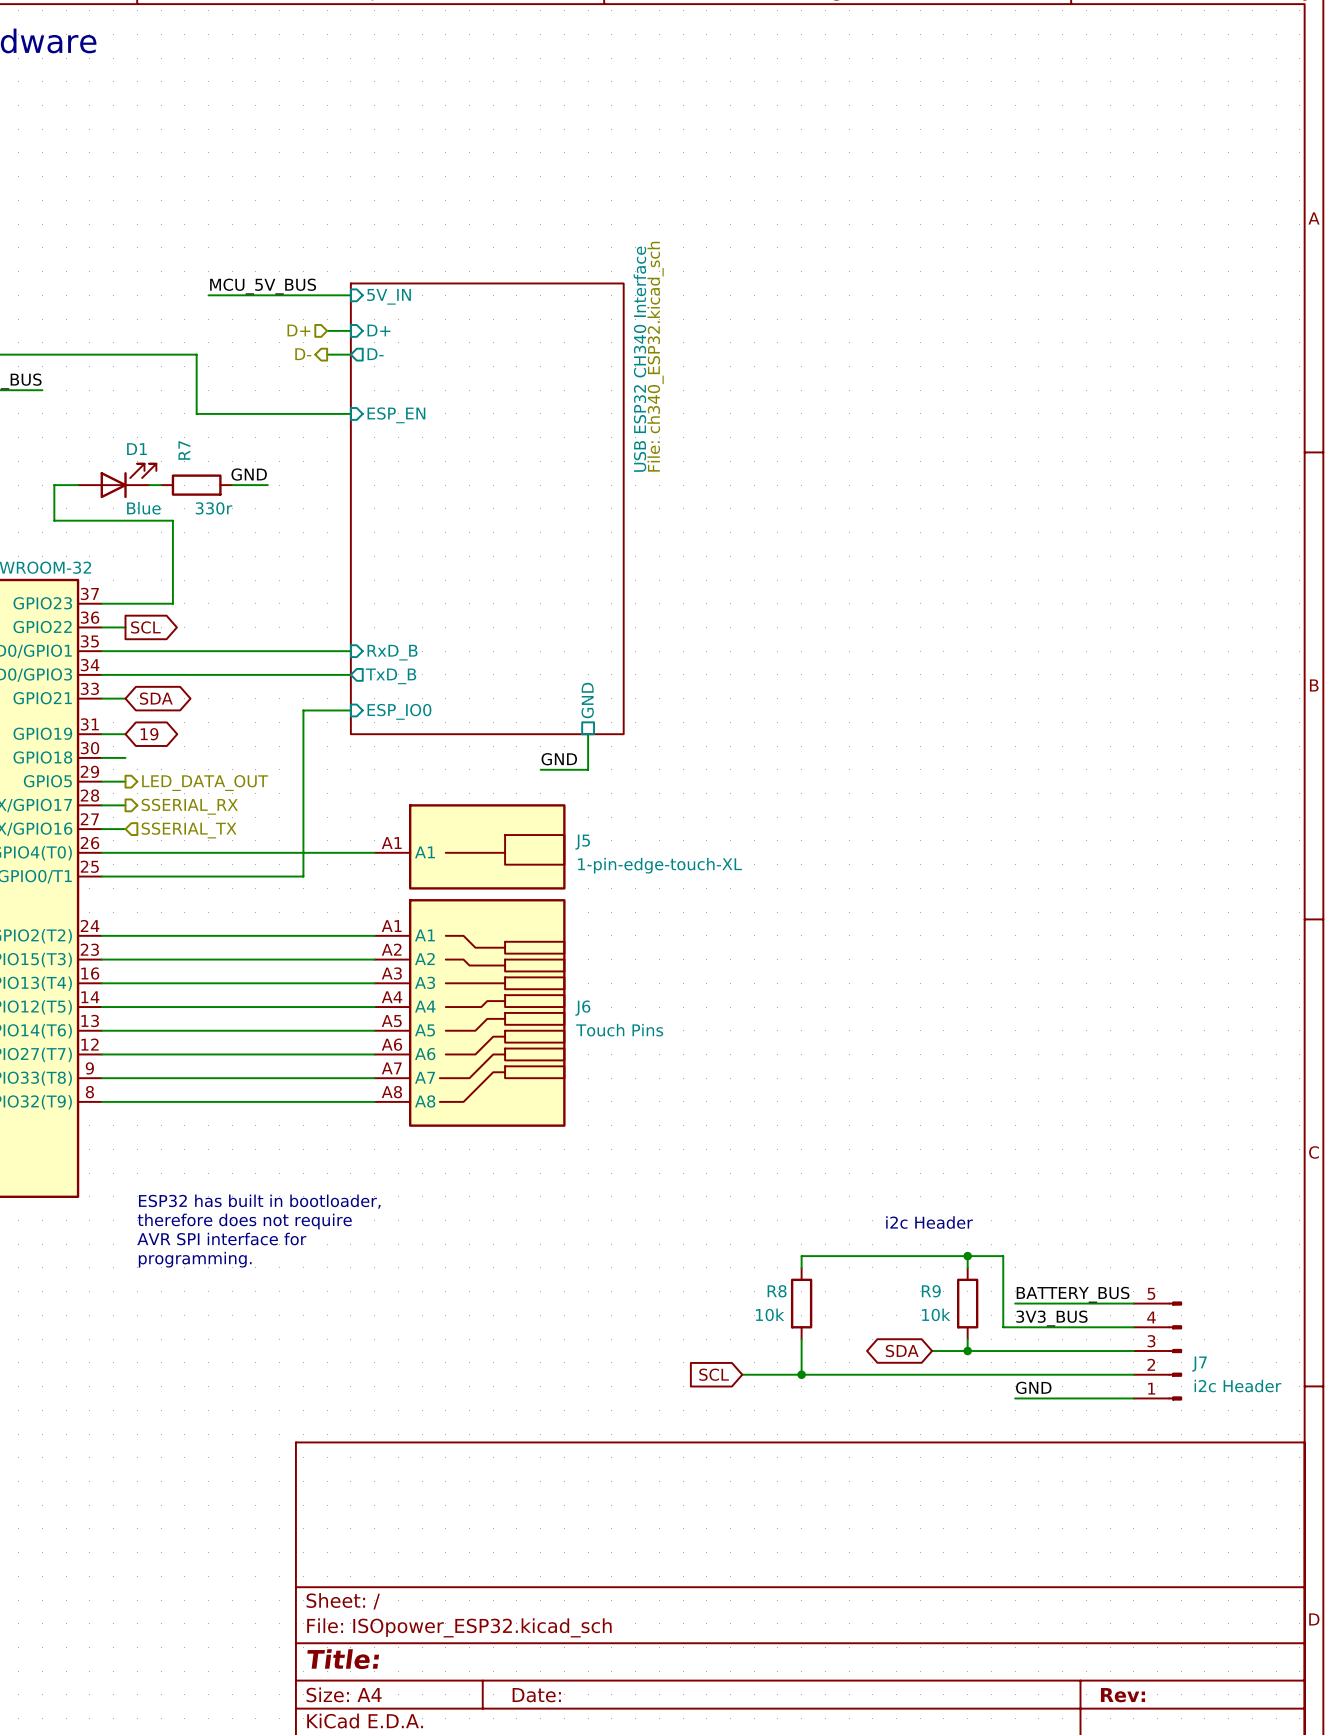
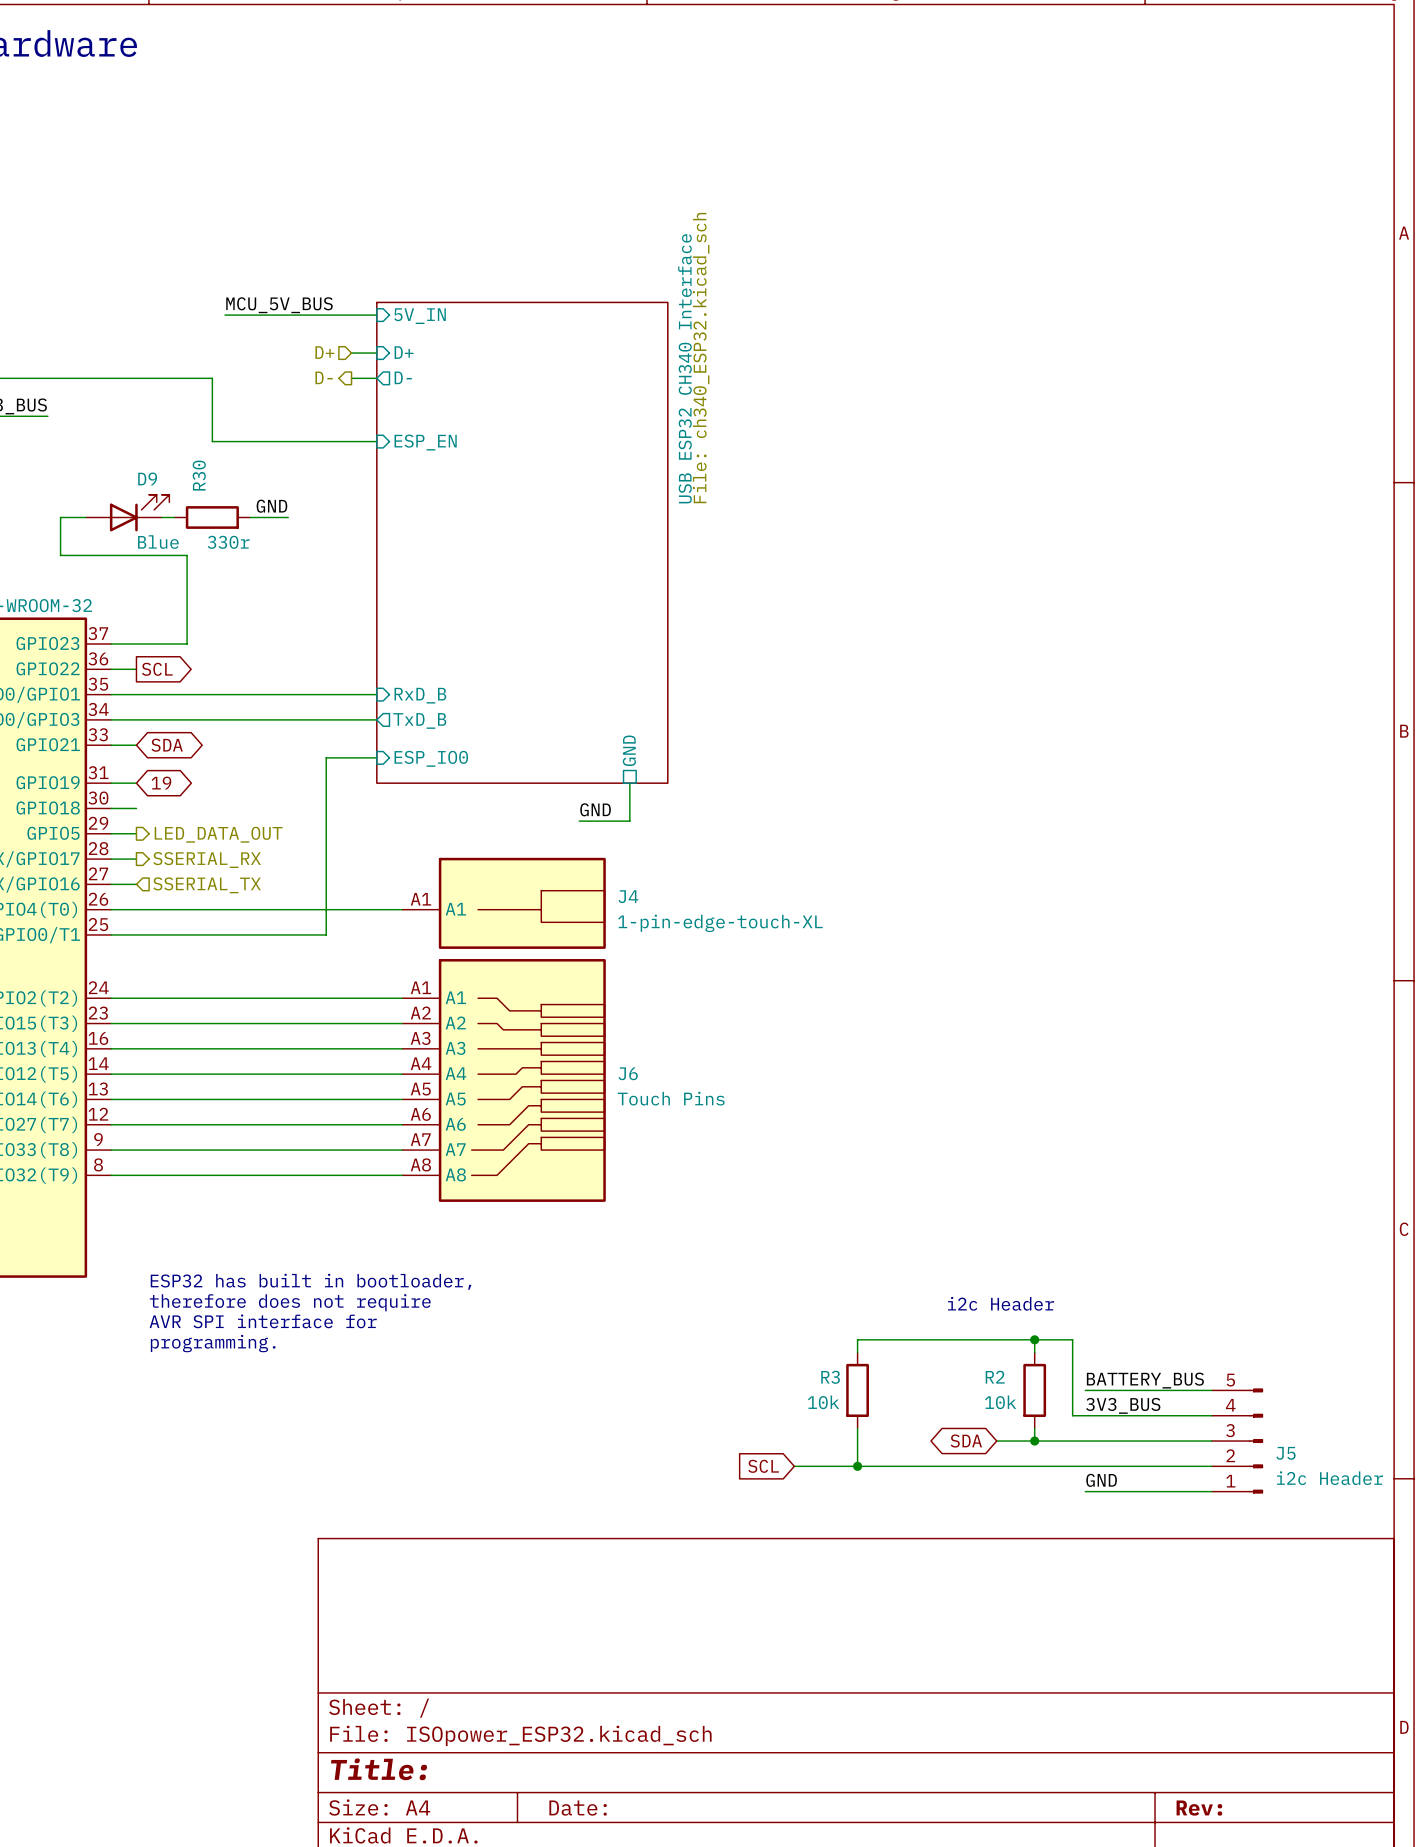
D1 name: D1 (136, 449) -> D9 (147, 478)
R7 name: R7 (184, 450) -> R30 (199, 475)
J5 name: J5 (582, 842) -> J4 (628, 896)
R8 name: R8 (777, 1291) -> R3 (830, 1377)
R9 name: R9 (931, 1291) -> R2 (995, 1377)
J7 name: J7 (1199, 1364) -> J5 (1286, 1453)

